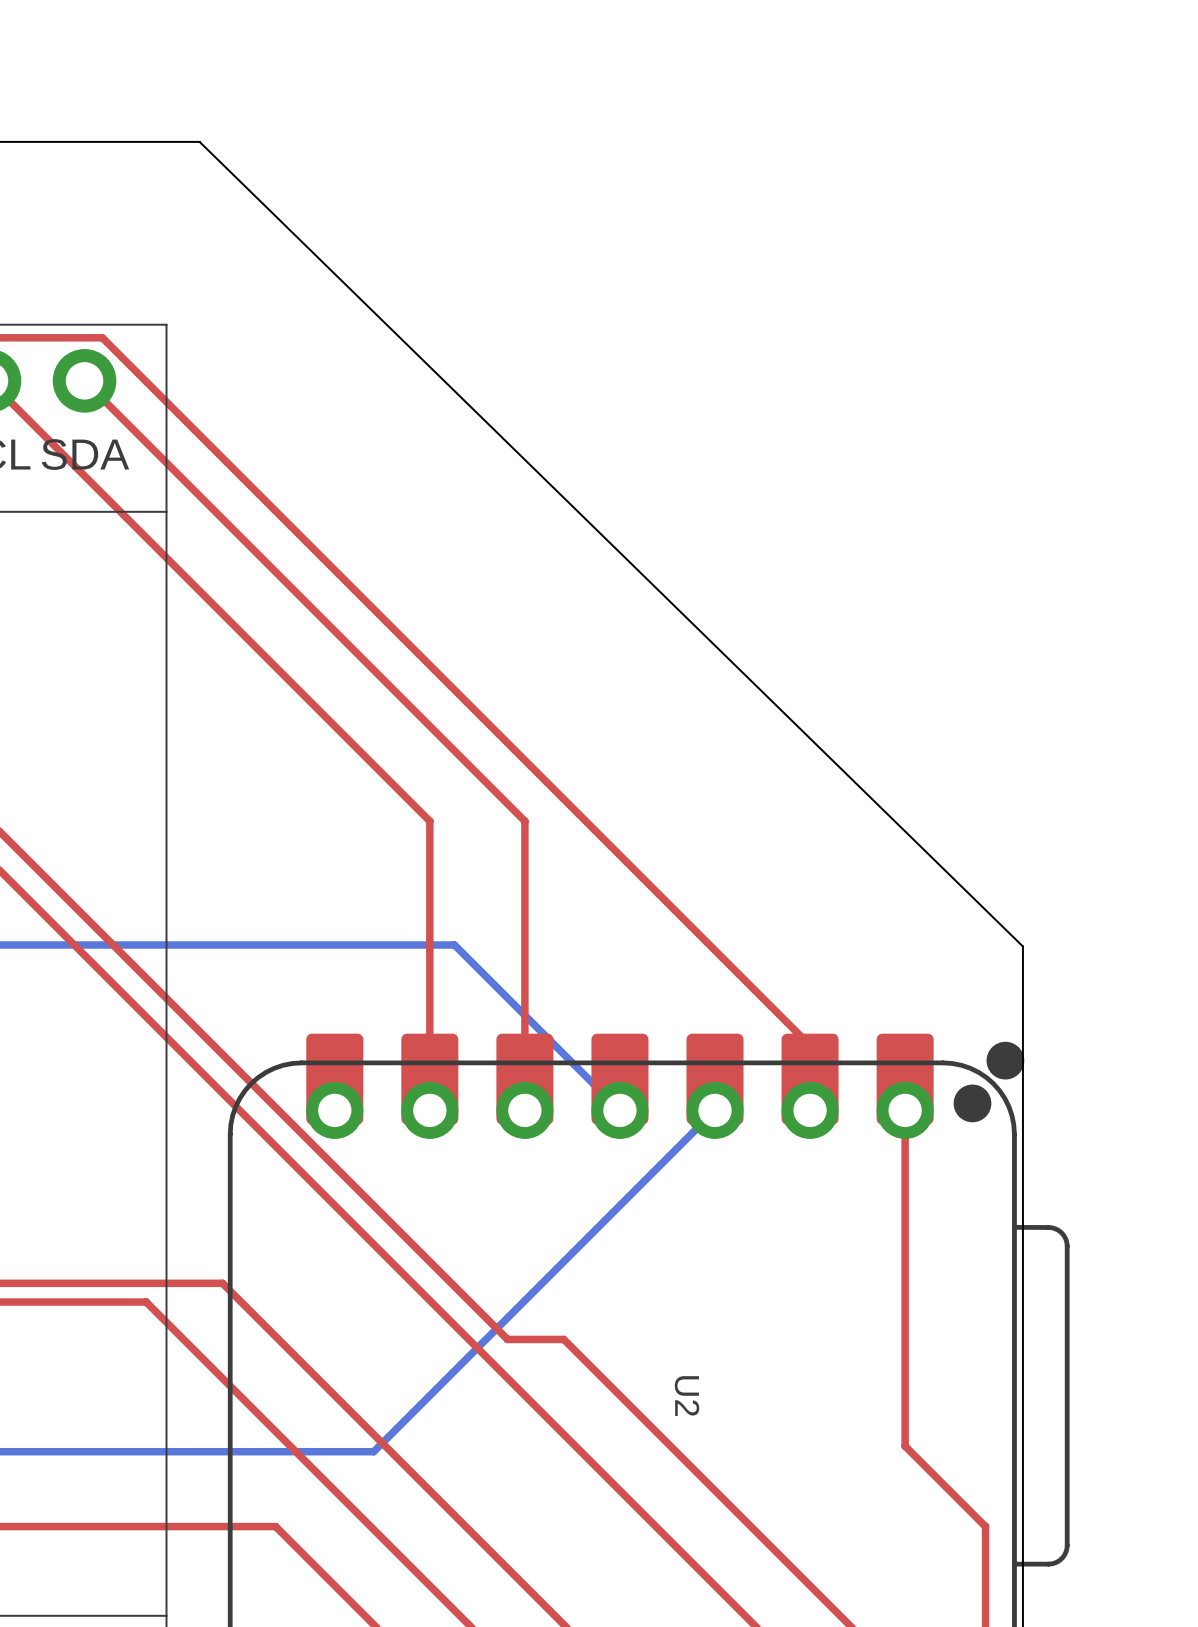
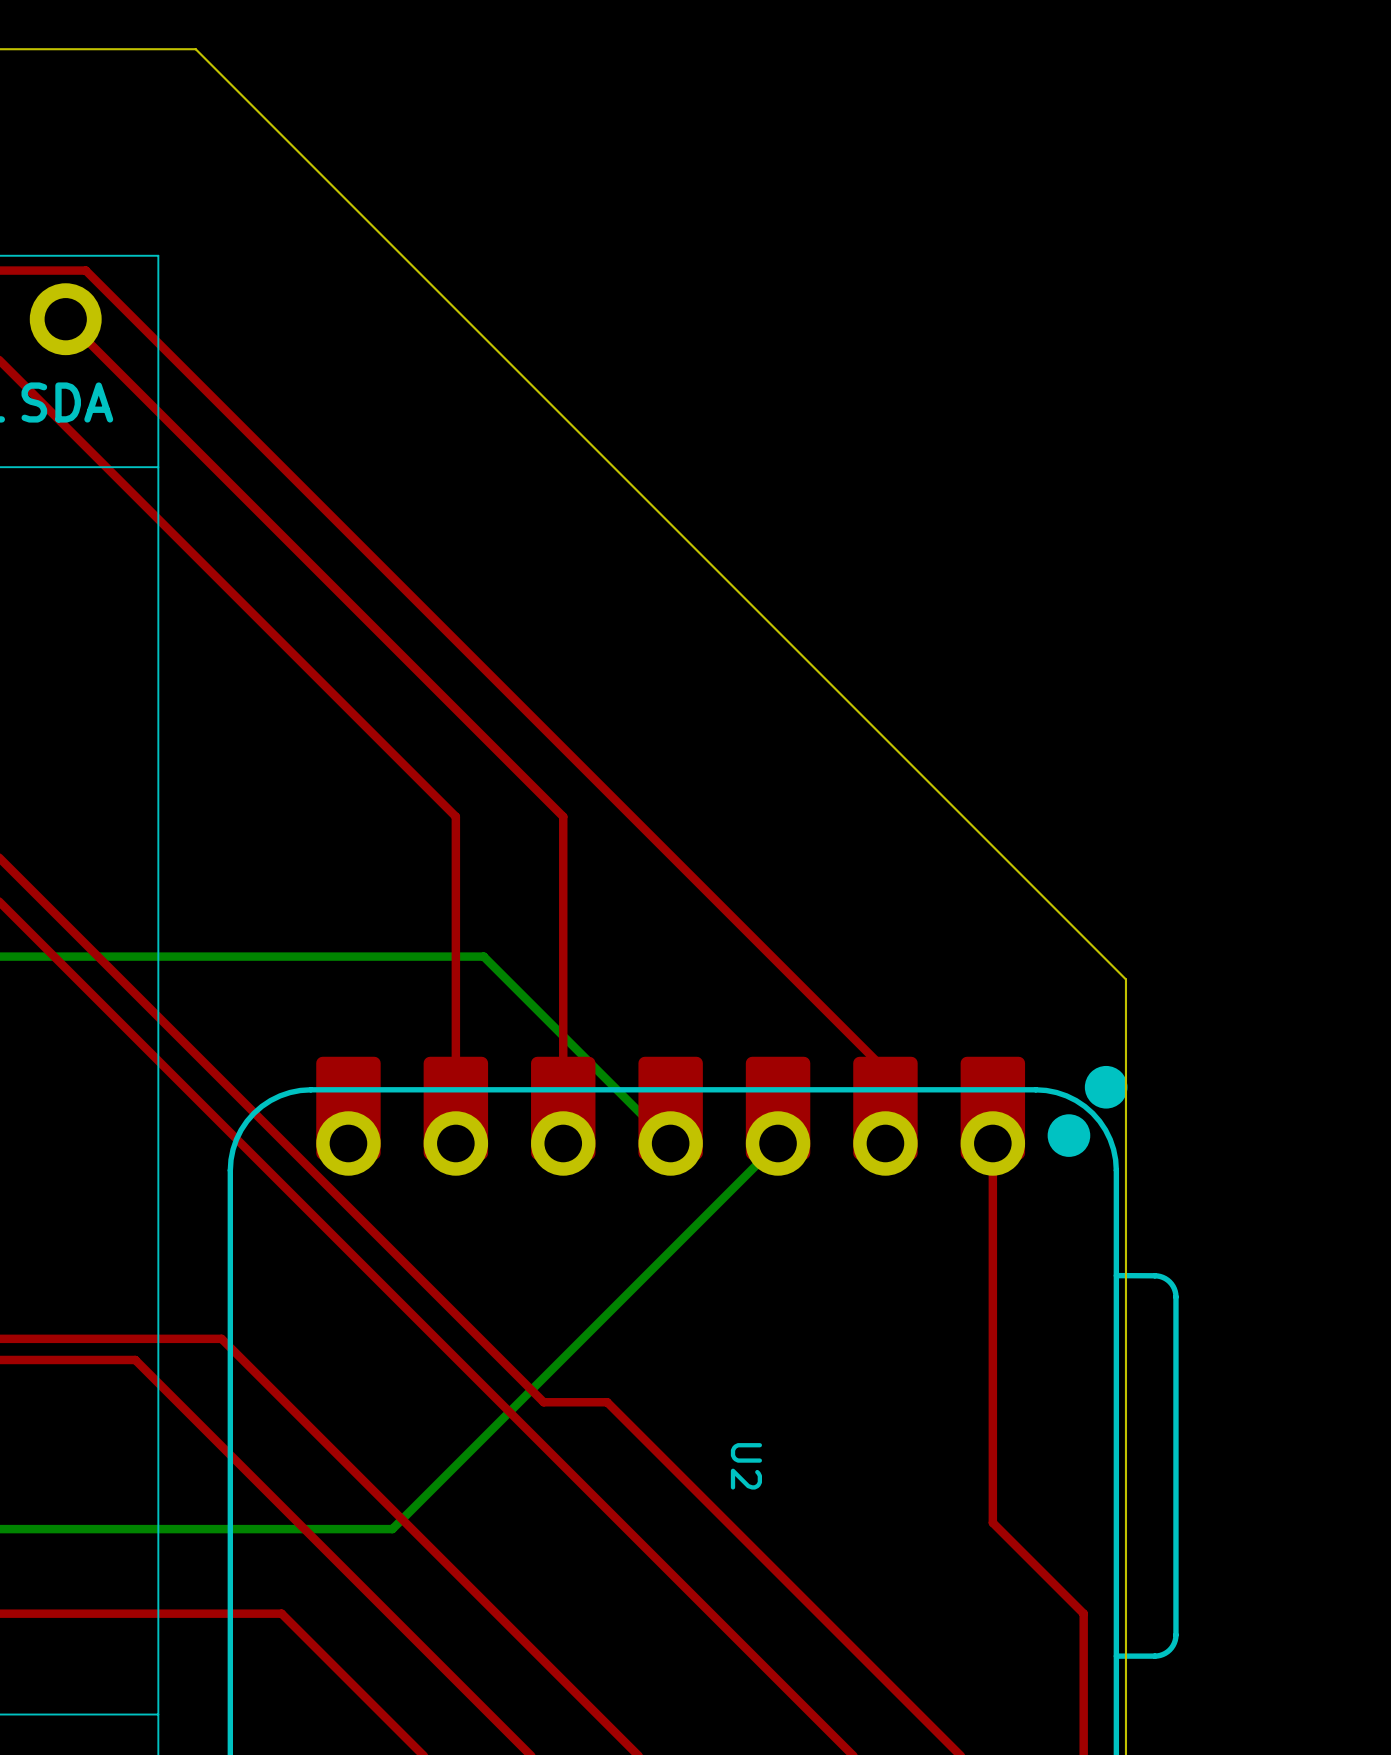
board edge: (199, 141) (1022, 946) (1022, 965) -> (195, 49) (1125, 979)

